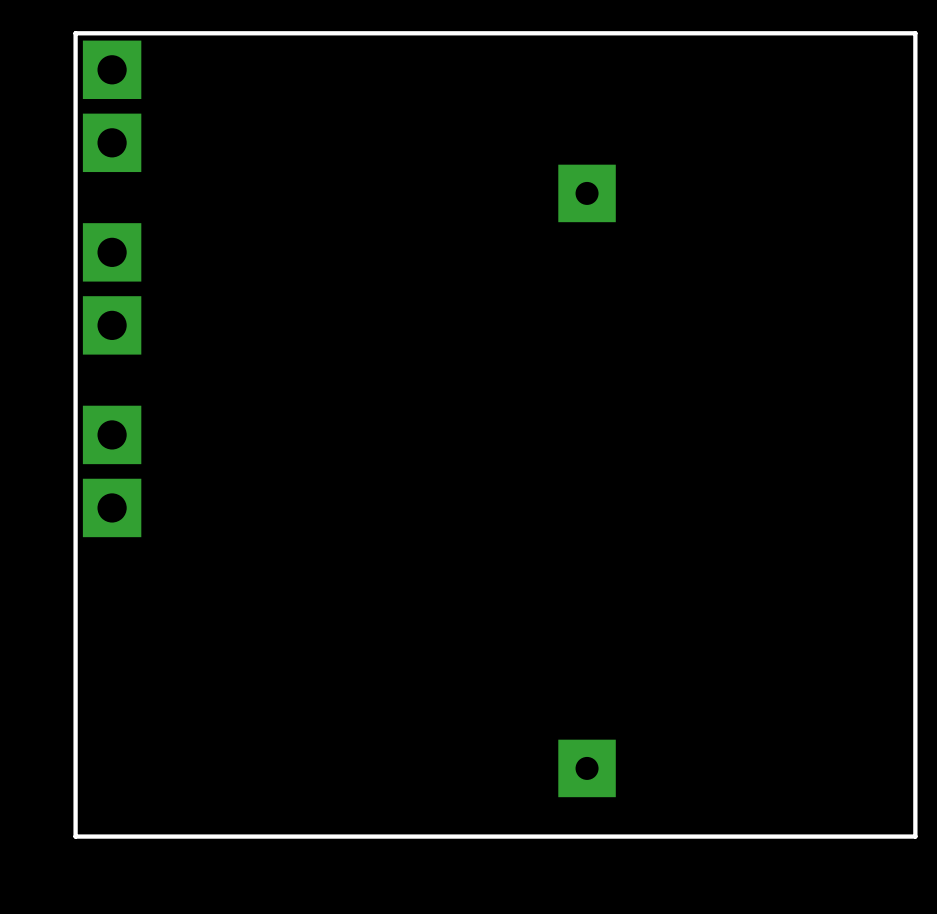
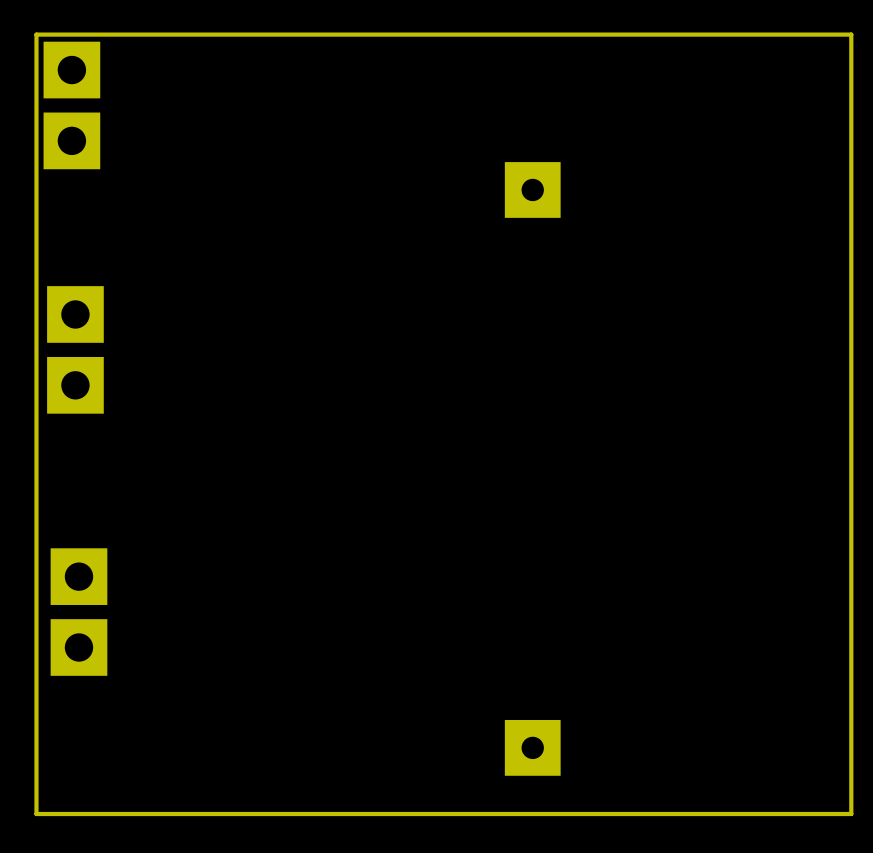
part: (112, 288) -> none
part: none -> (75, 349)
part: (112, 471) -> none
part: none -> (78, 612)

